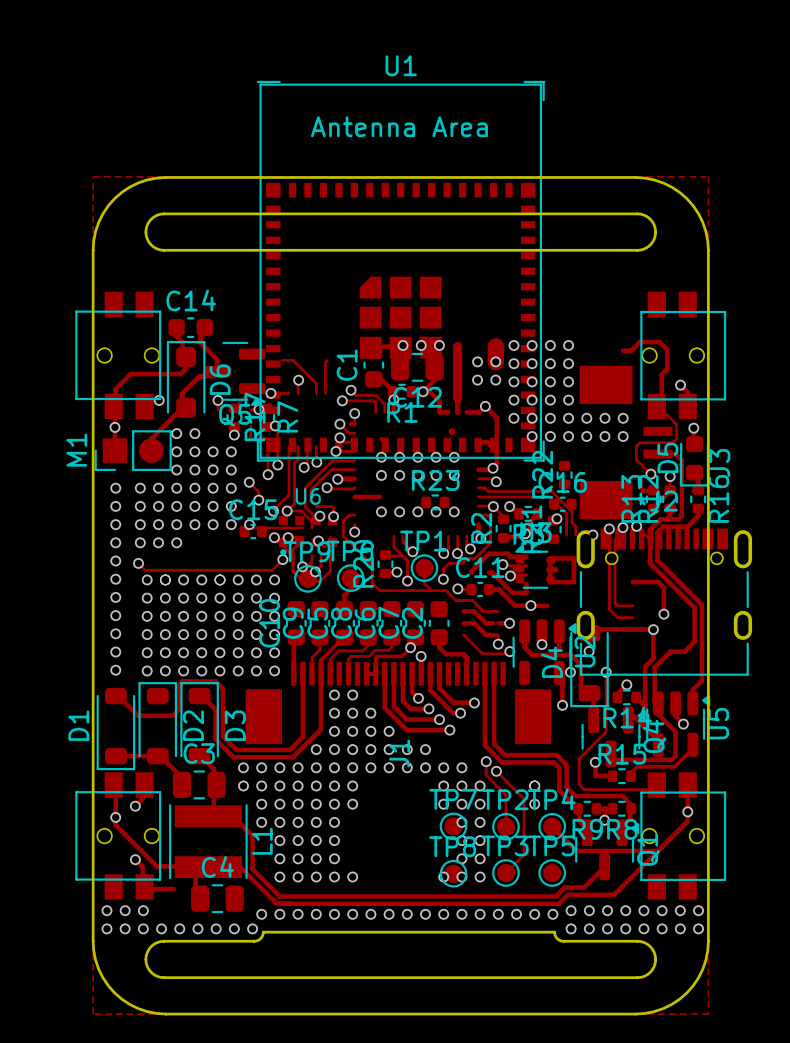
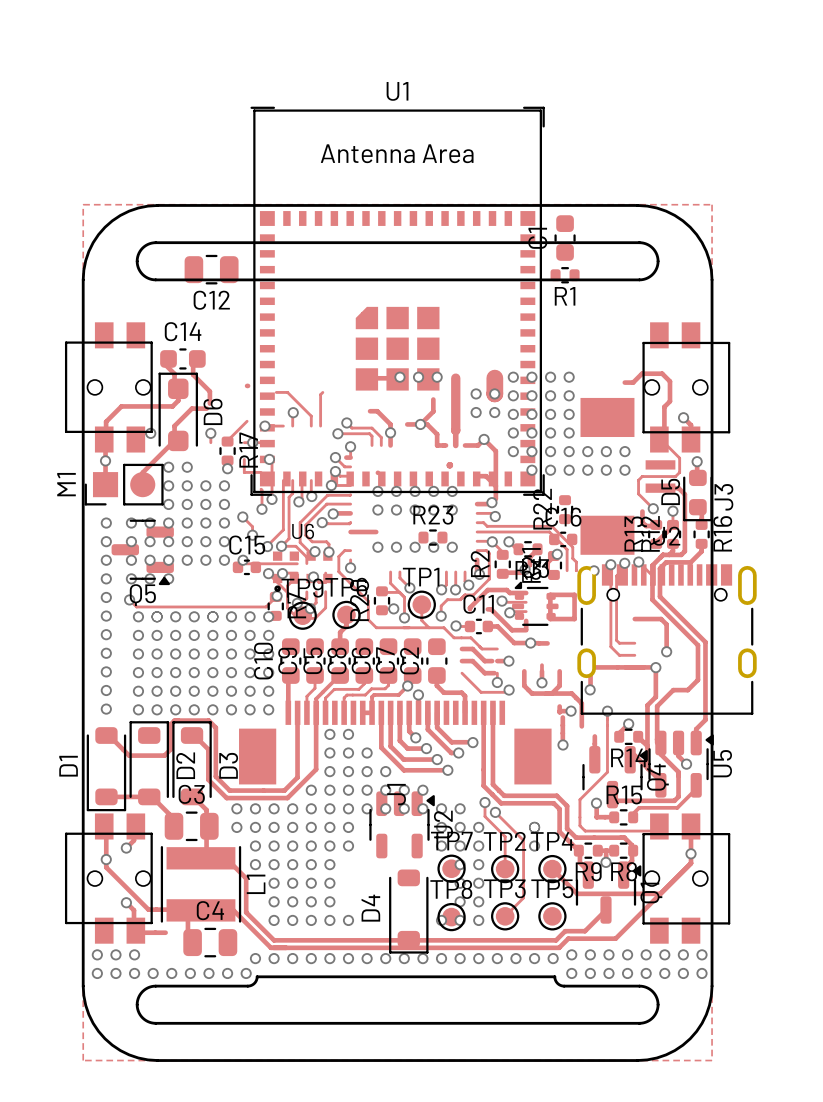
C1 position: (373, 365) -> (565, 238)
C12 position: (417, 367) -> (211, 269)
Q5 position: (235, 373) -> (142, 552)
R1 position: (402, 391) -> (565, 275)
R7 position: (267, 417) -> (275, 606)
U2 position: (544, 652) -> (402, 824)
D4 position: (589, 666) -> (408, 911)

